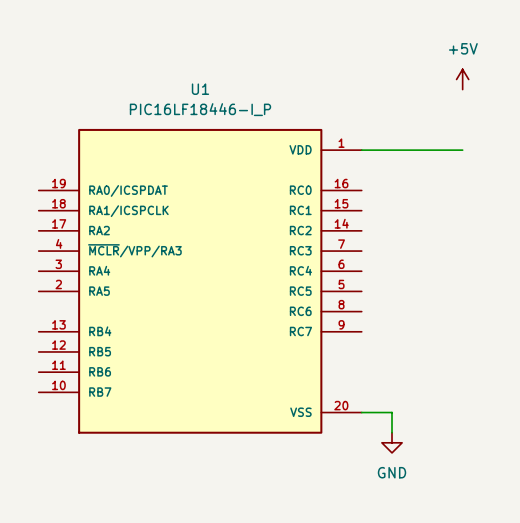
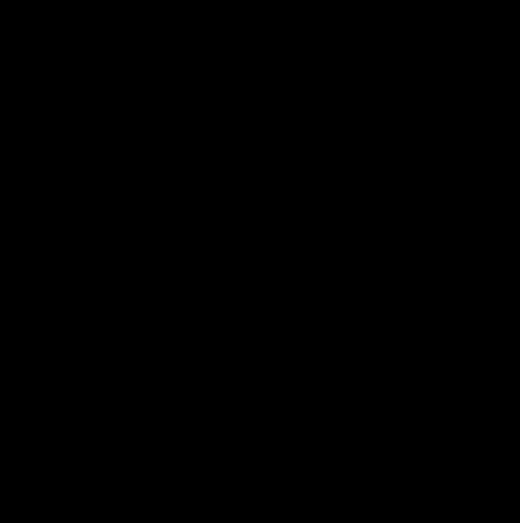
power symbol: +5V (462, 79) -> none
wire: (361, 150) (462, 150) -> none
U1: PIC16LF18446-I_P (200, 281) -> none
wire: (361, 412) (392, 412) (392, 432) -> none
power symbol: GND (392, 442) -> none

